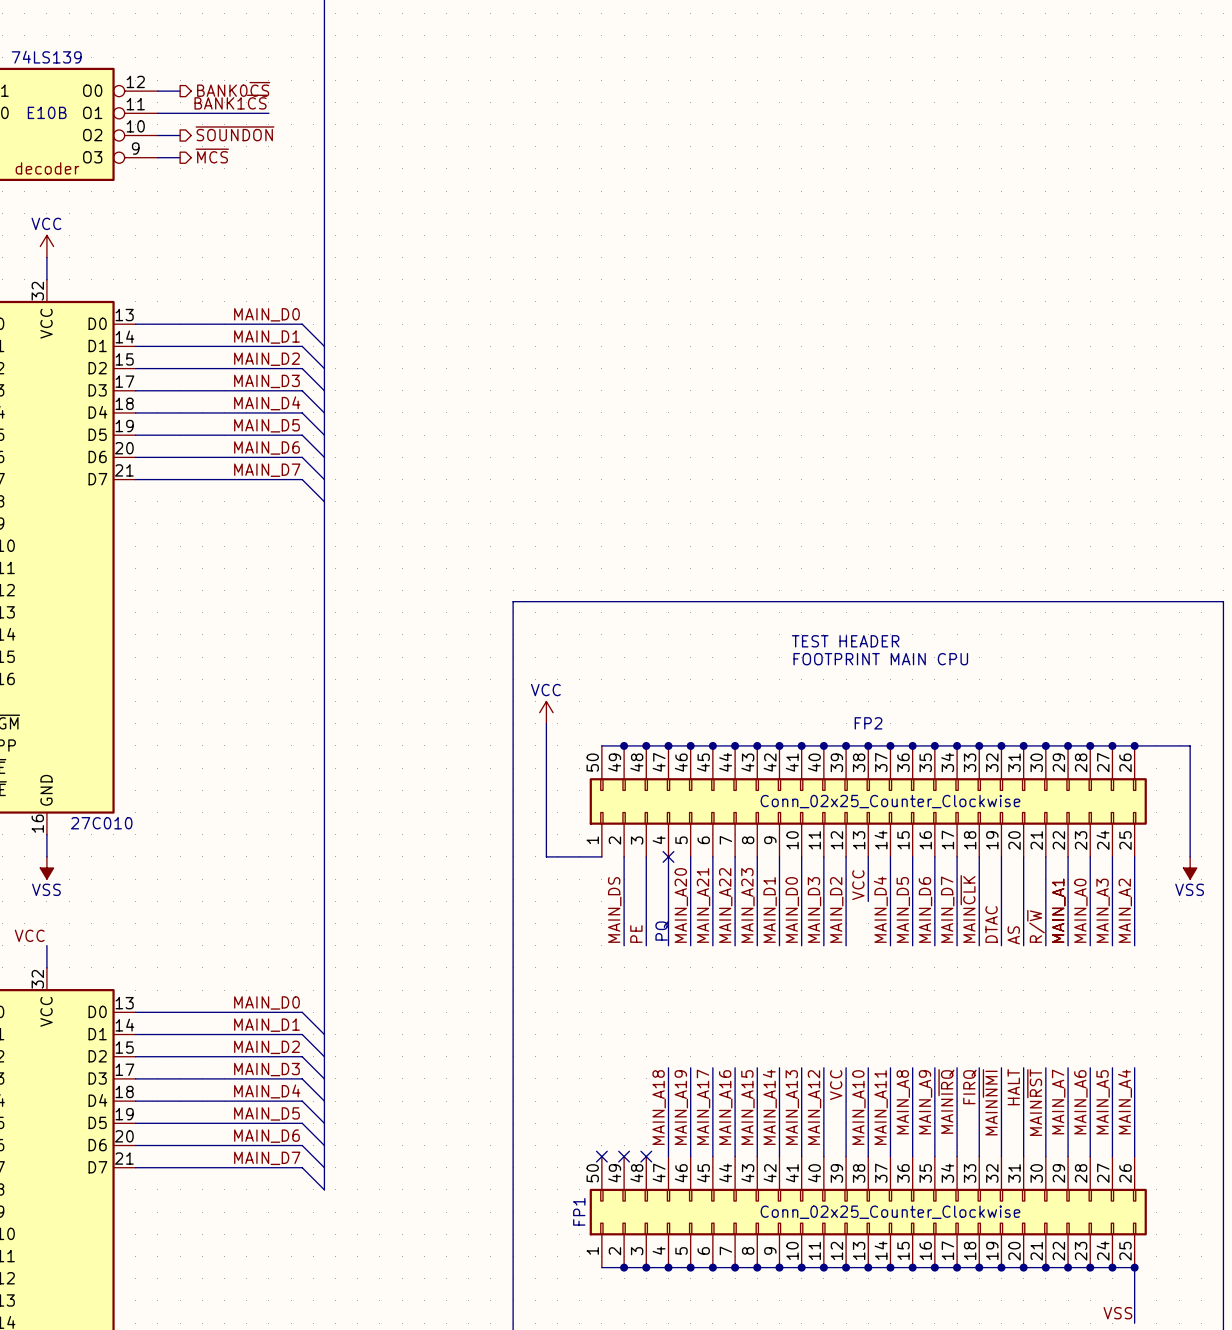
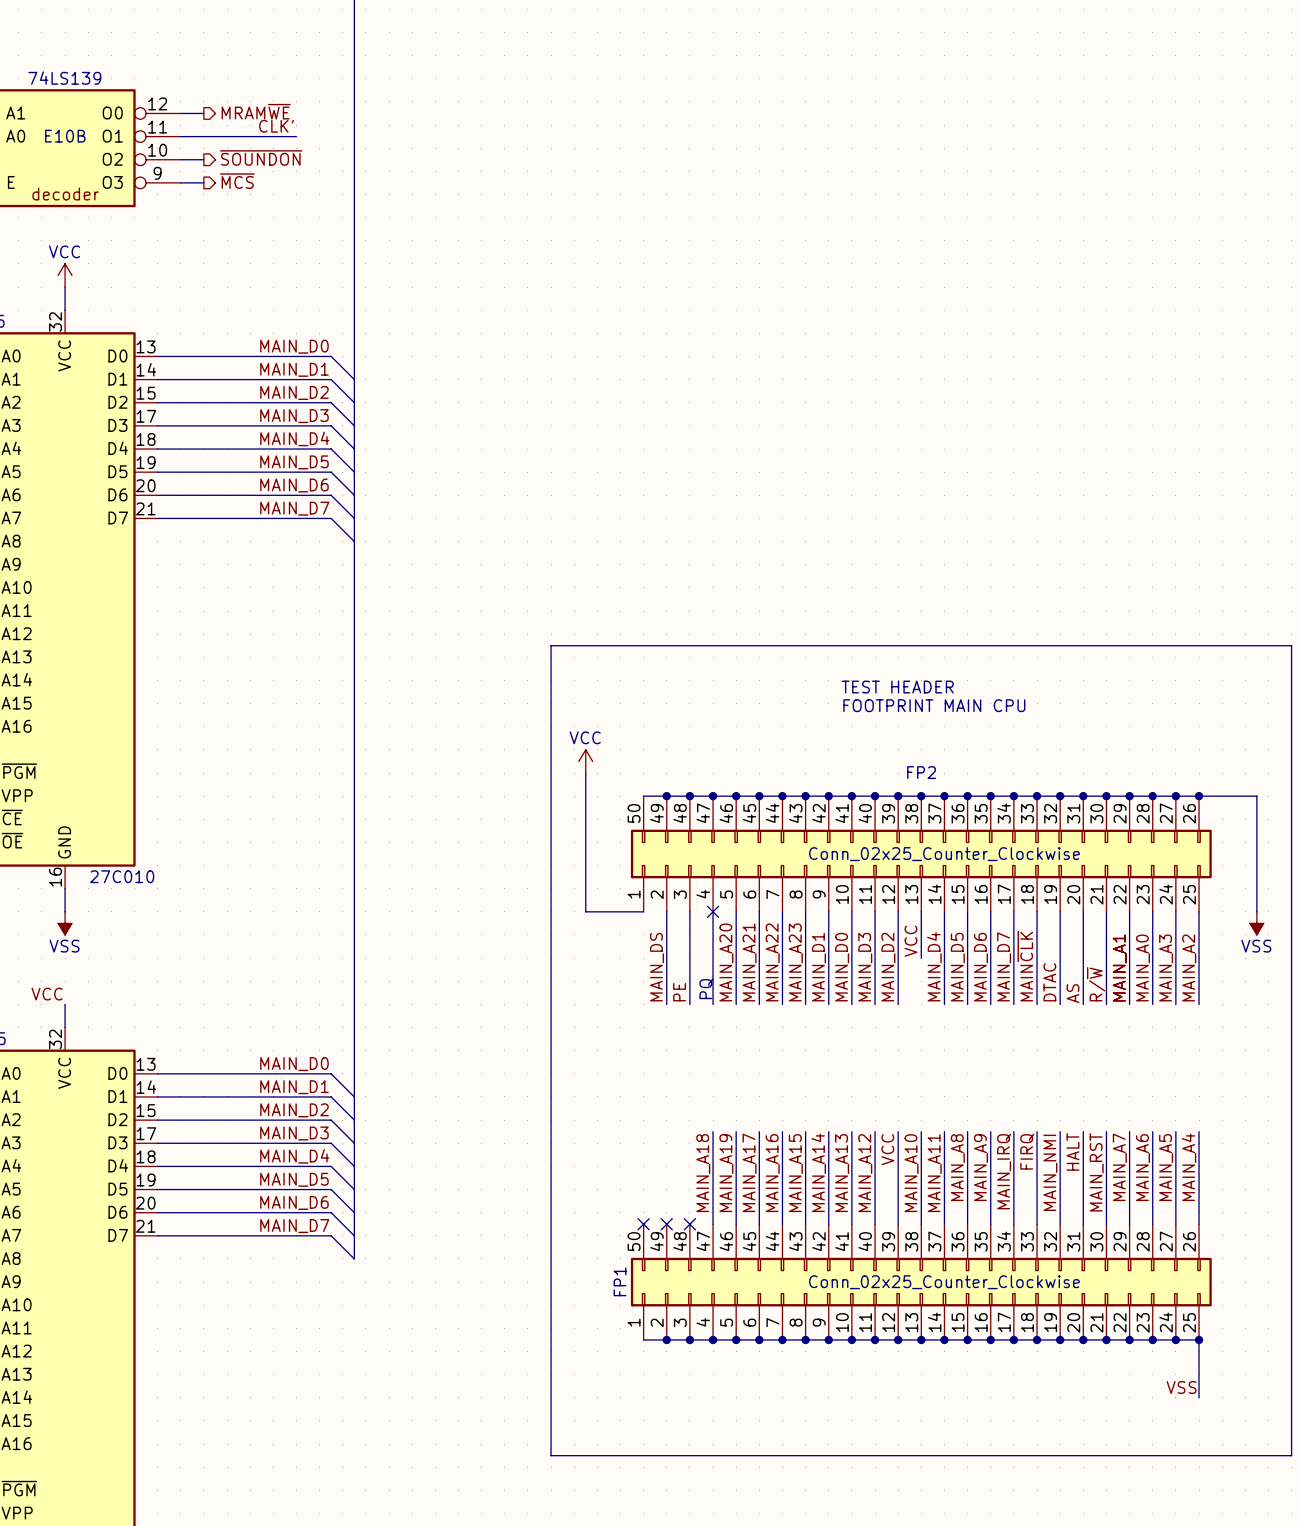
hierarchical label: BANK0~{CS} (233, 89) -> MRAM~{WE} (256, 111)
label: BANK1~{CS} (231, 102) -> CLK' (276, 126)
label: MAIN~{IRQ} (946, 1101) -> MAIN_IRQ (1004, 1171)
label: MAIN~{NMI} (990, 1102) -> MAIN_NMI (1050, 1172)
label: MAIN~{RST} (1034, 1102) -> MAIN_RST (1096, 1172)

